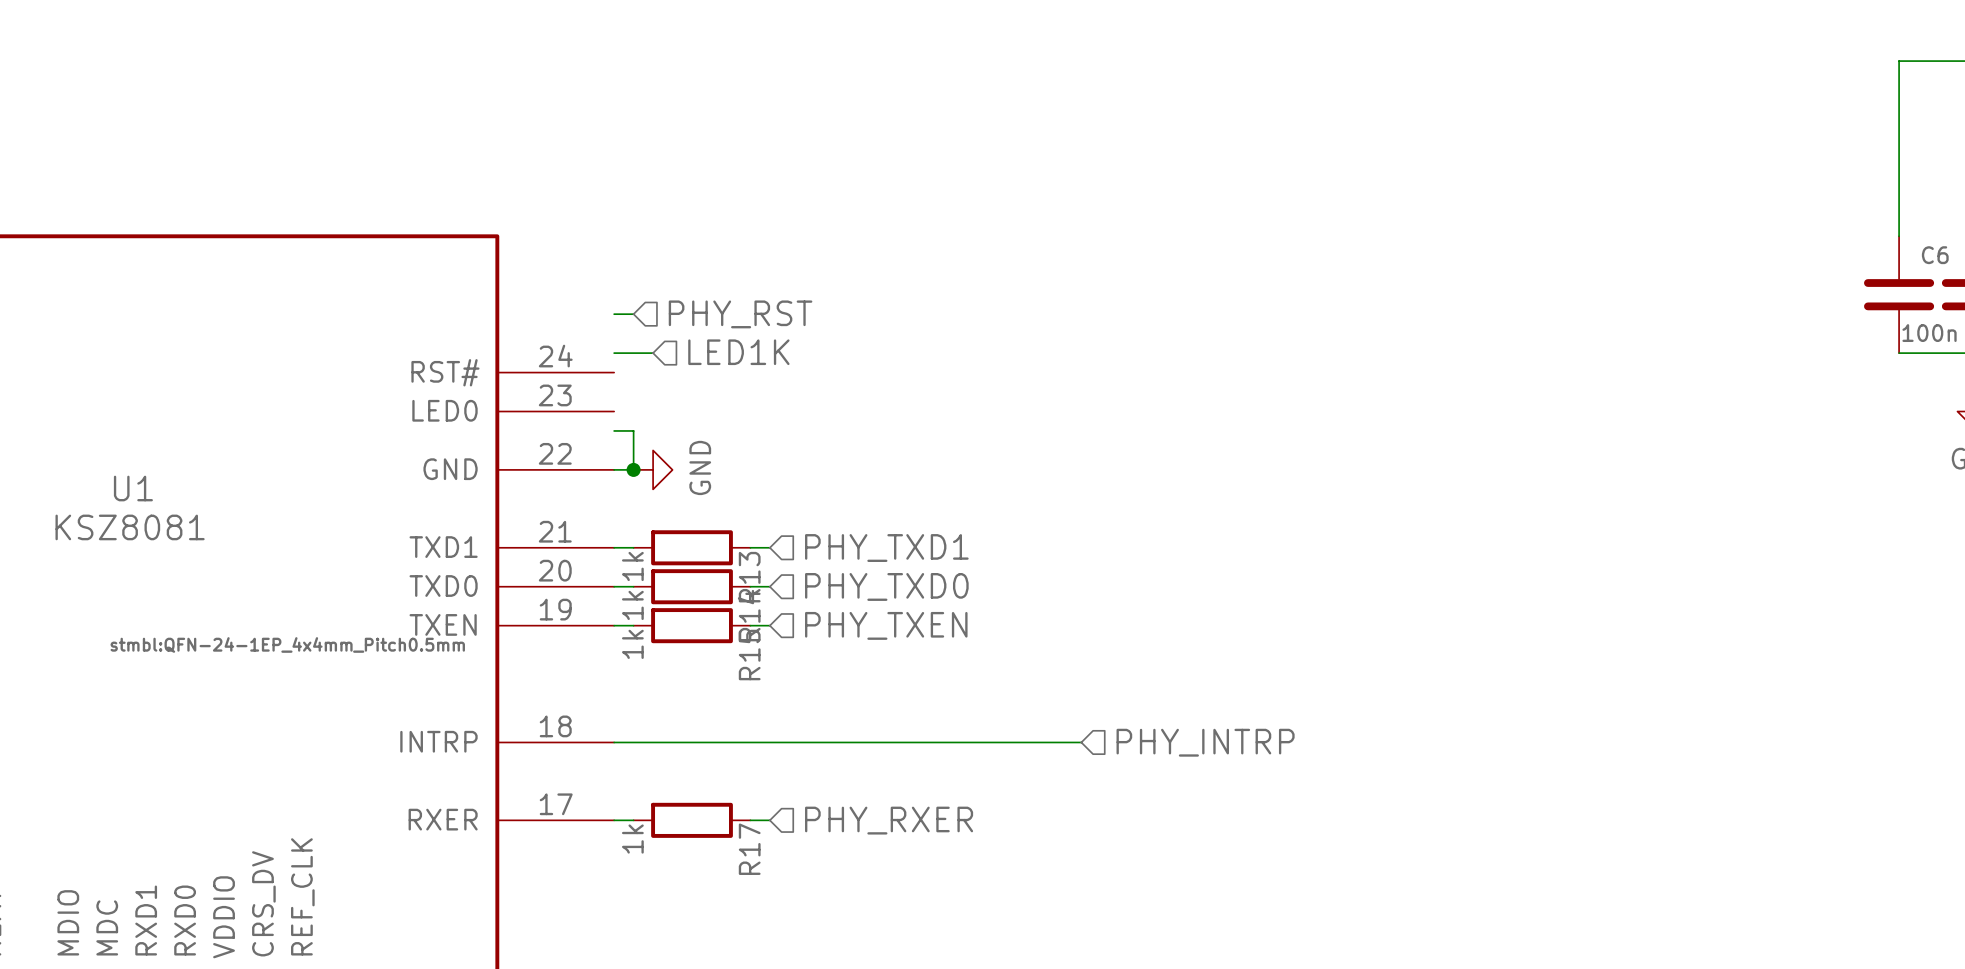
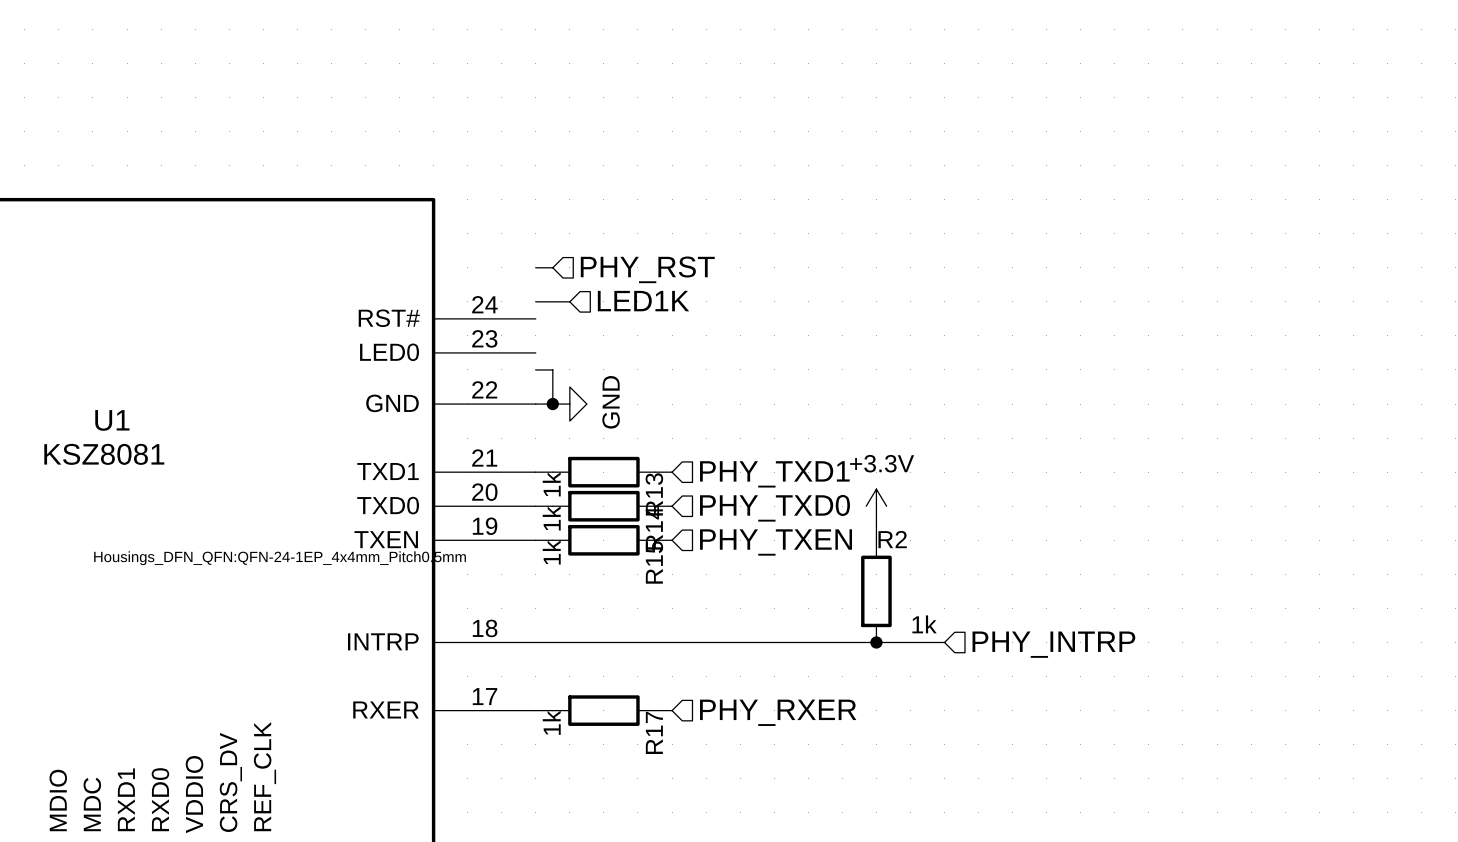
power symbol: none -> +3.3V (876, 506)
wire: none -> (876, 523) (876, 540)
U1 text: stmbl:QFN-24-1EP_4x4mm_Pitch0.5mm (287, 644) -> Housings_DFN_QFN:QFN-24-1EP_4x4mm_Pitch0.5mm (280, 558)
R2: none -> 1k (876, 591)
junction: none -> (876, 642)

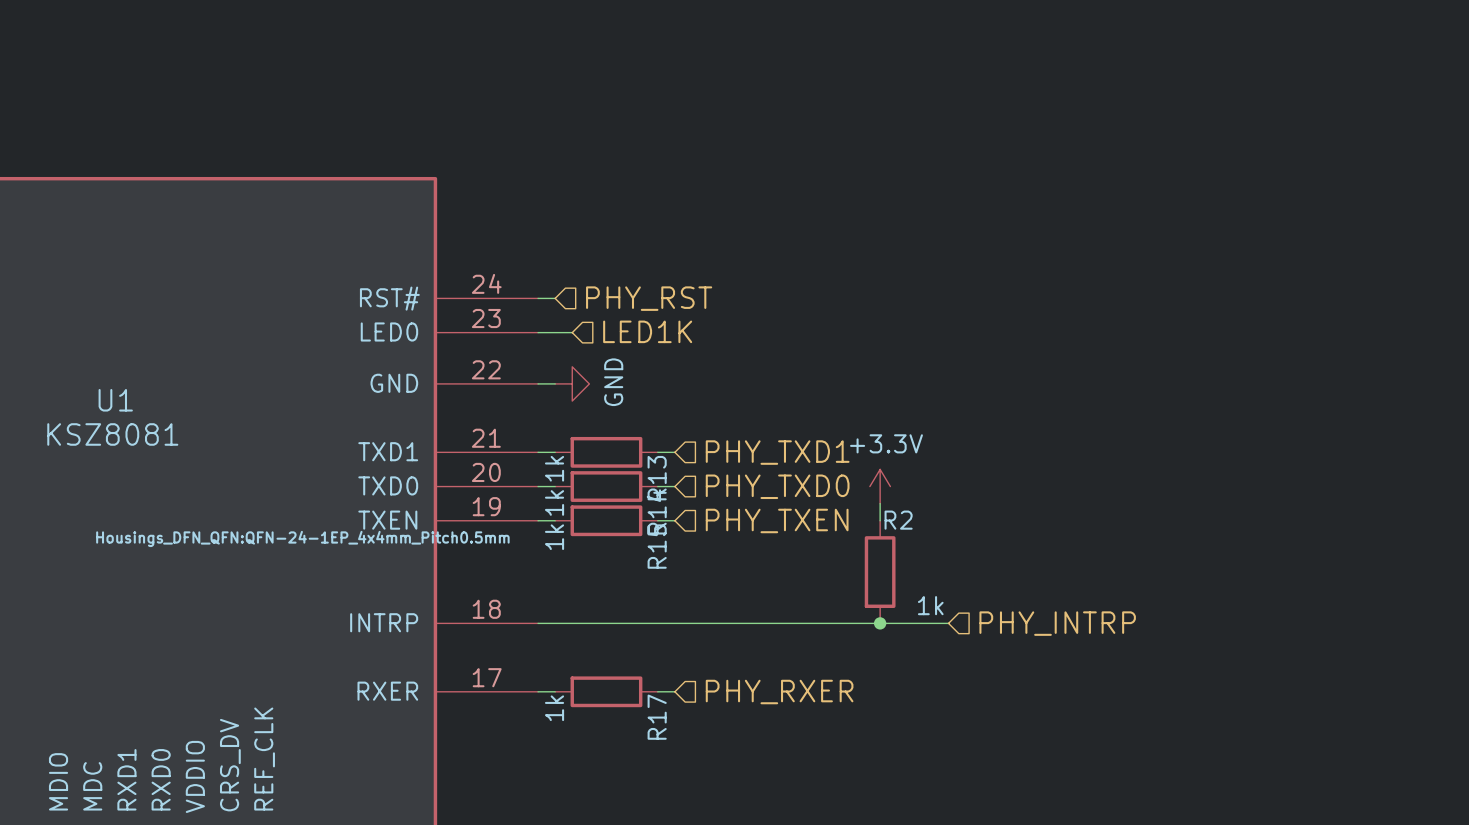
wire: (535, 267) (552, 267) -> (538, 298) (555, 298)
hierarchical label position: PHY_RST (647, 269) -> PHY_RST (649, 298)
wire: (535, 301) (569, 301) -> (538, 332) (572, 332)
hierarchical label position: LED1K (643, 301) -> LED1K (647, 331)
wire: (535, 369) (552, 369) (552, 404) -> none
junction: (552, 404) -> none

